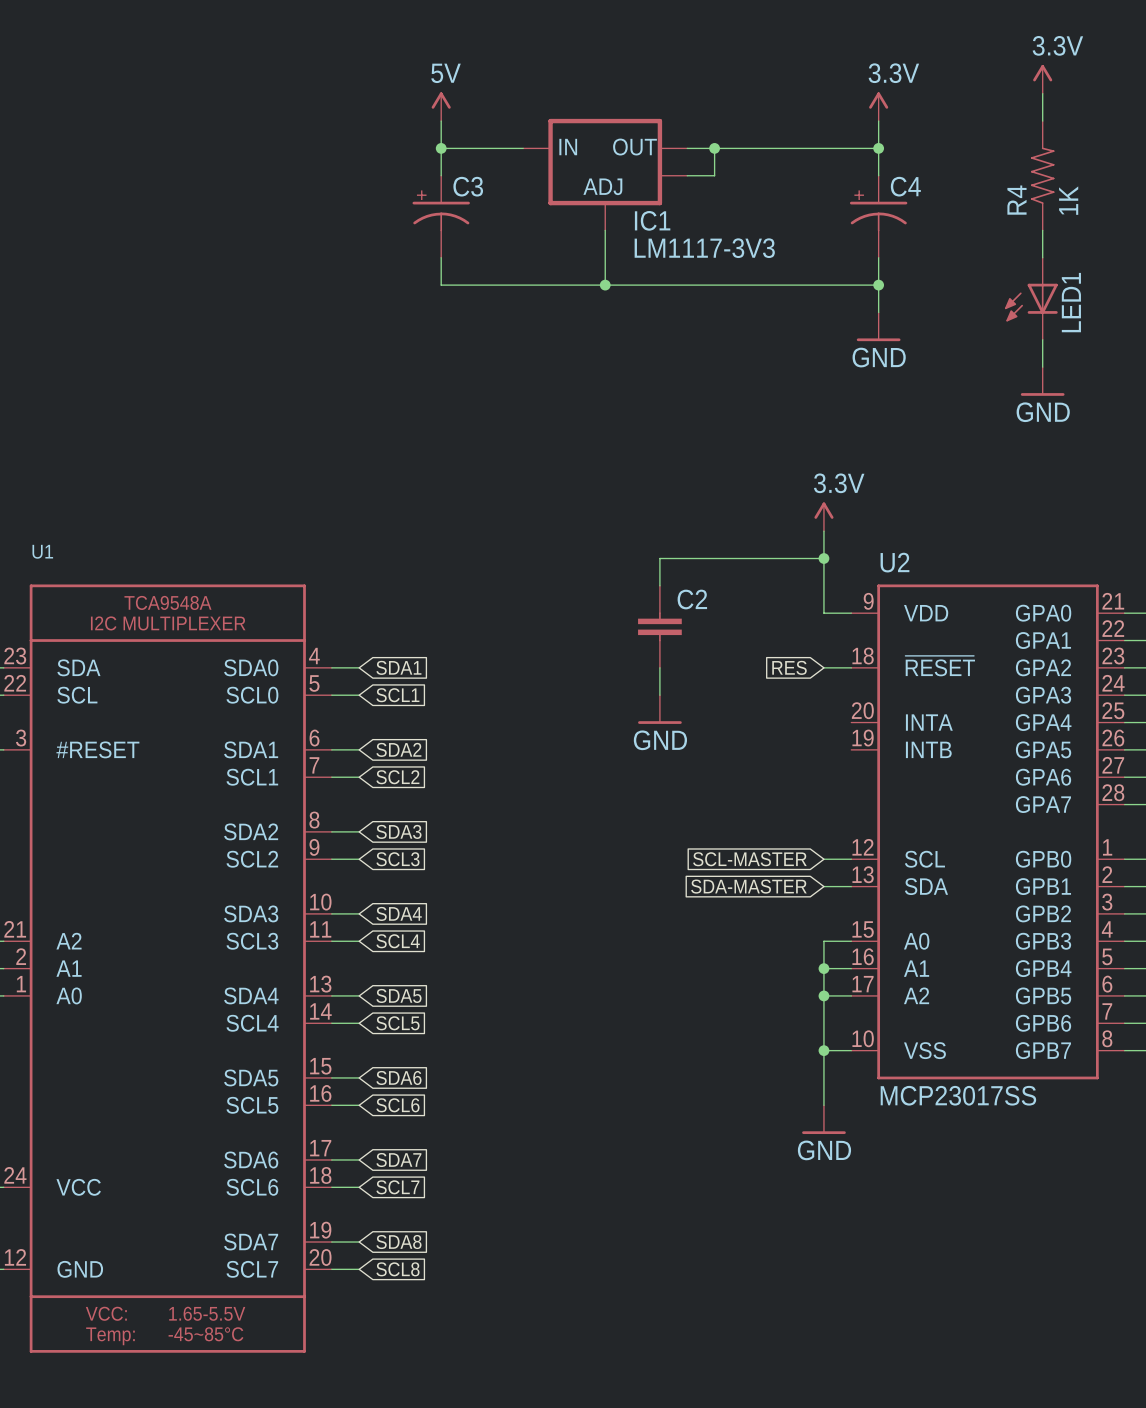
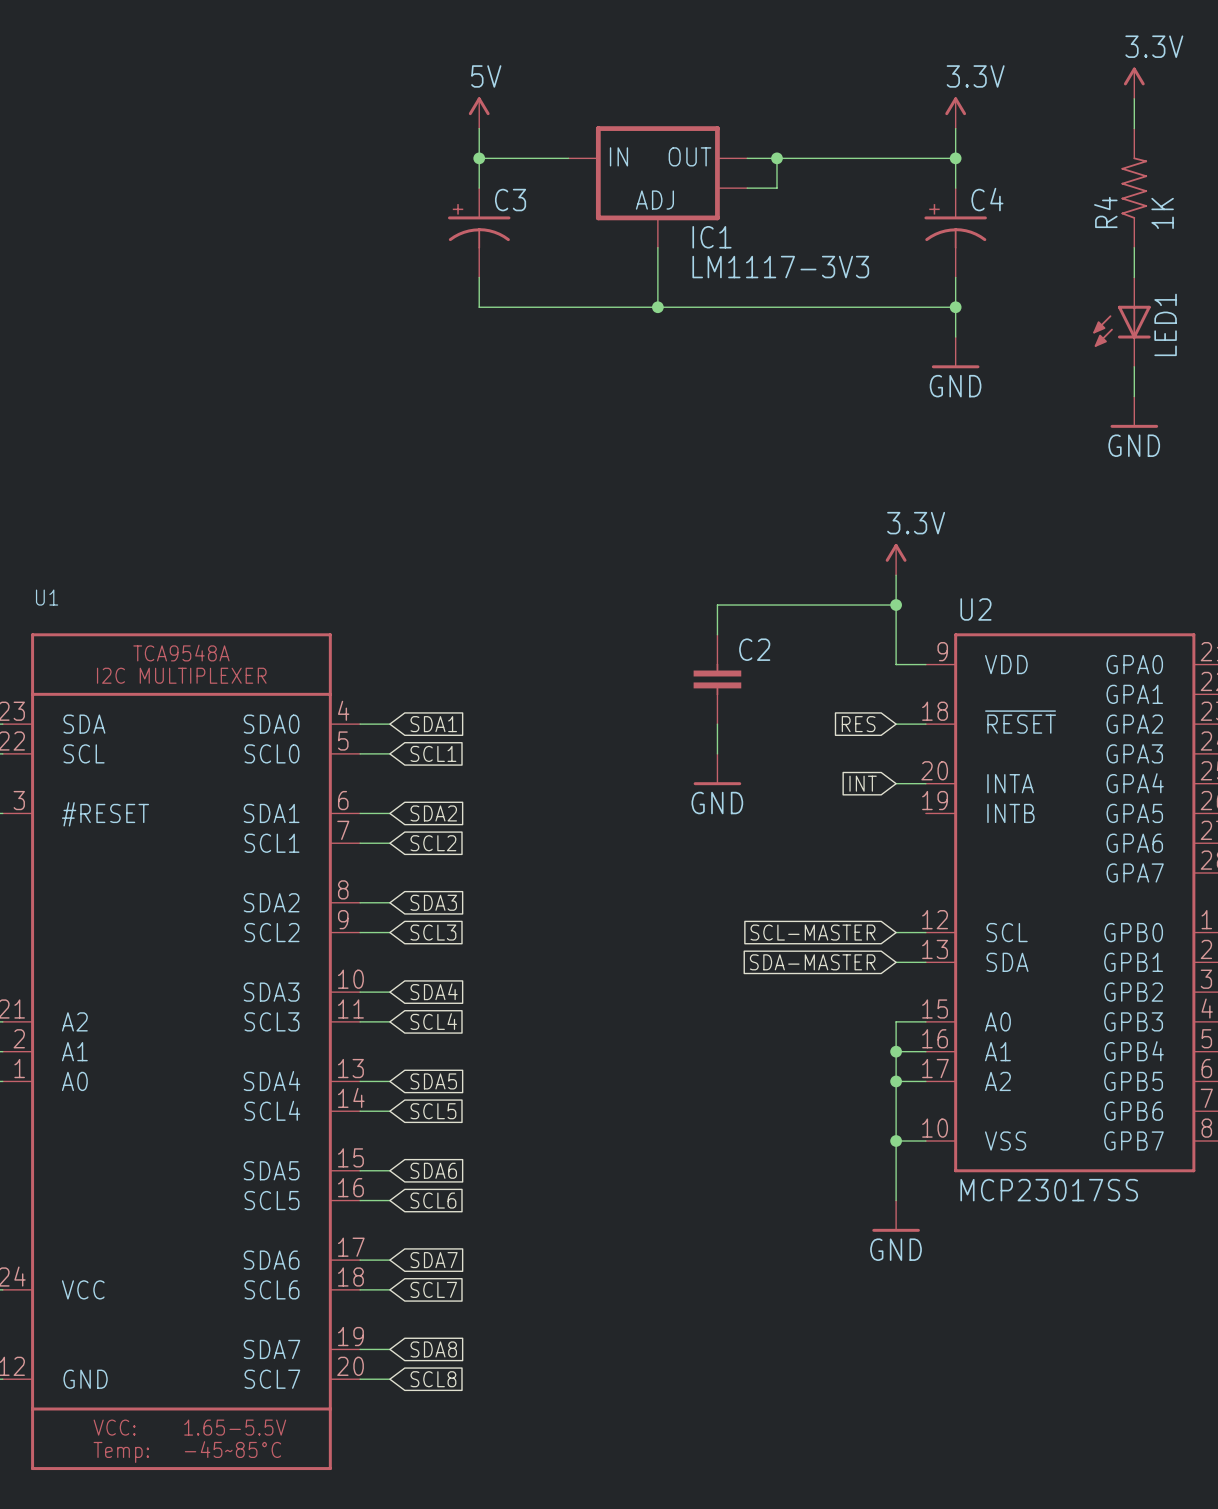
global label: none -> INT (863, 783)
wire: none -> (896, 783) (925, 783)

